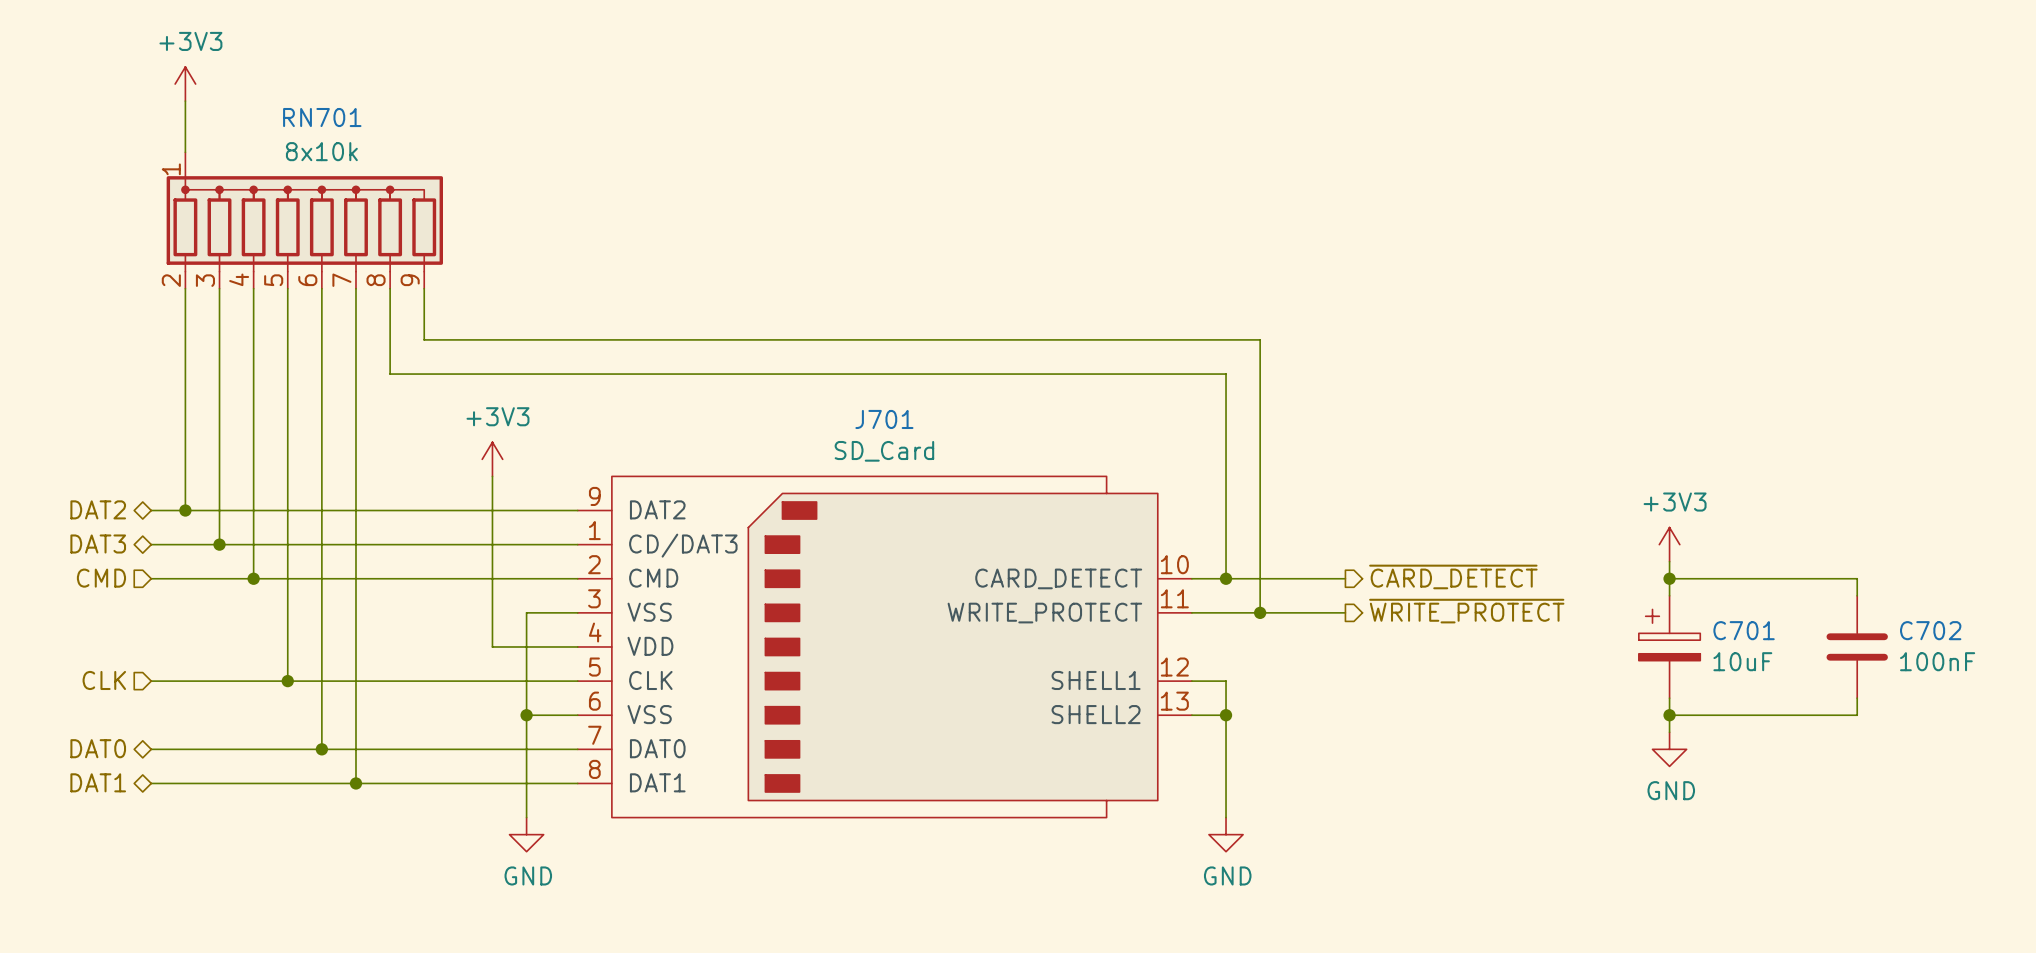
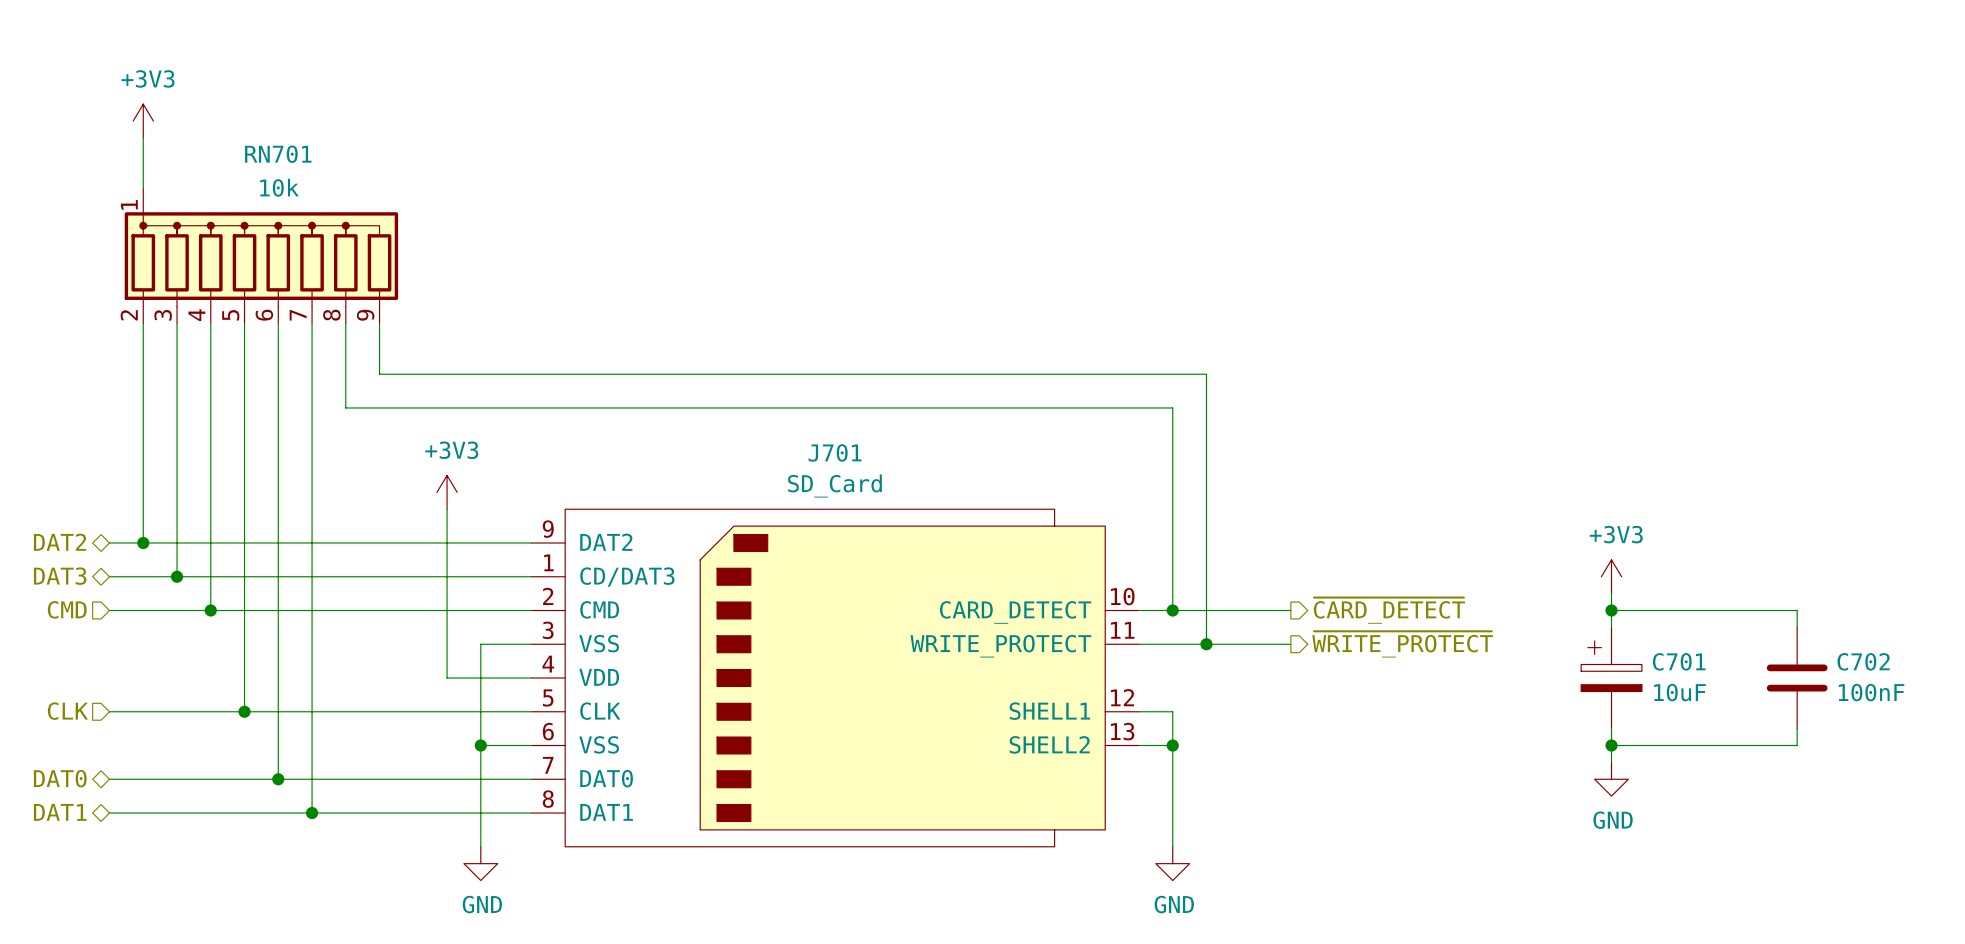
RN701 value: 8x10k (321, 151) -> 10k (279, 187)

